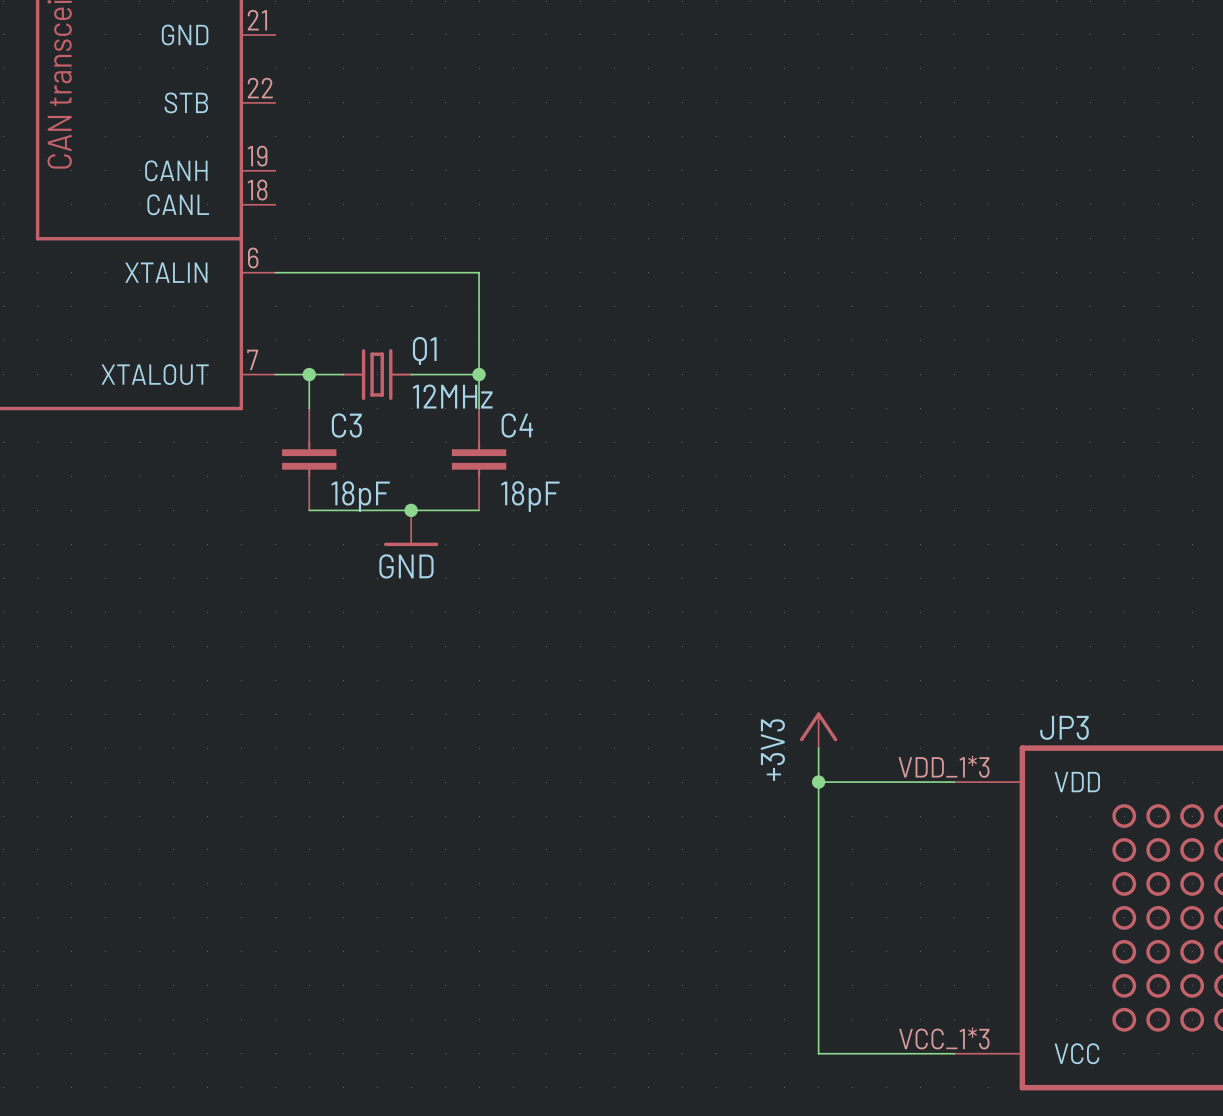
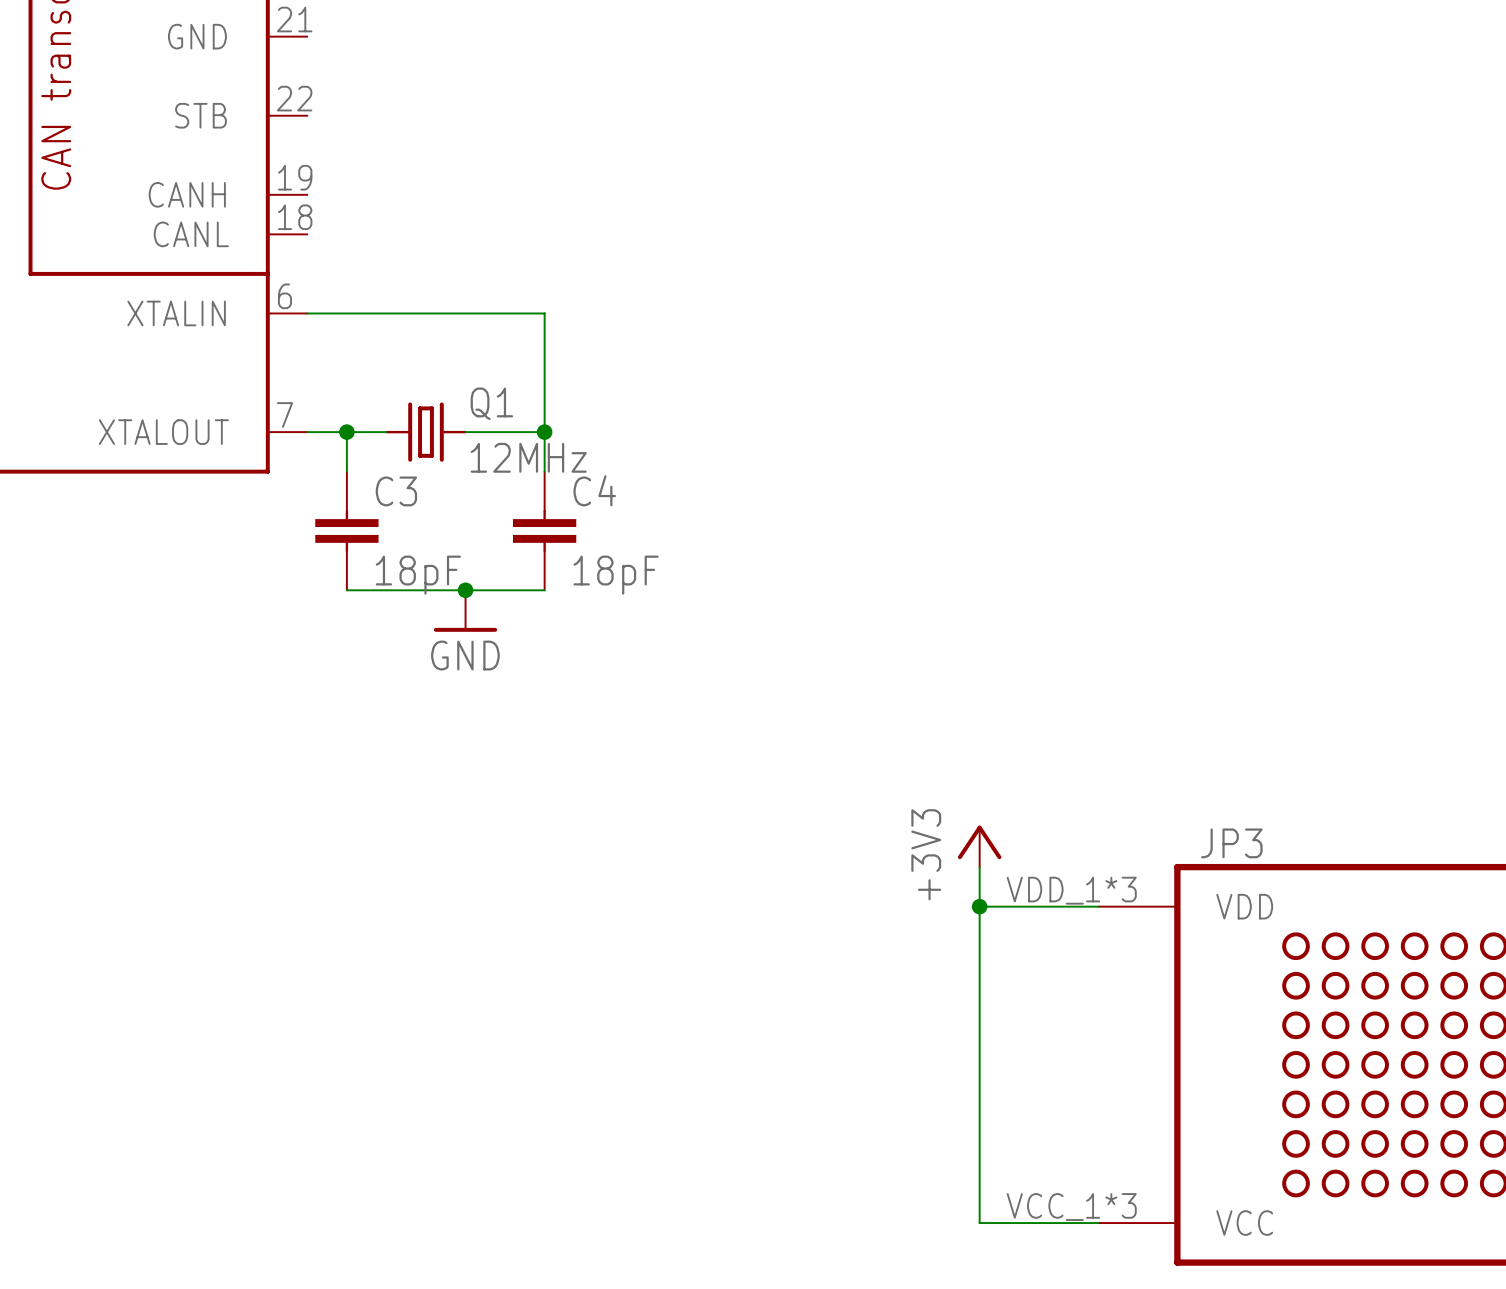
power symbol position: +3V3 (818, 730) -> +3V3 (979, 846)
wire: (818, 748) (818, 1053) (852, 1053) -> (979, 867) (979, 1223)
wire: (818, 782) (852, 782) -> none
junction position: (818, 782) -> (979, 906)

